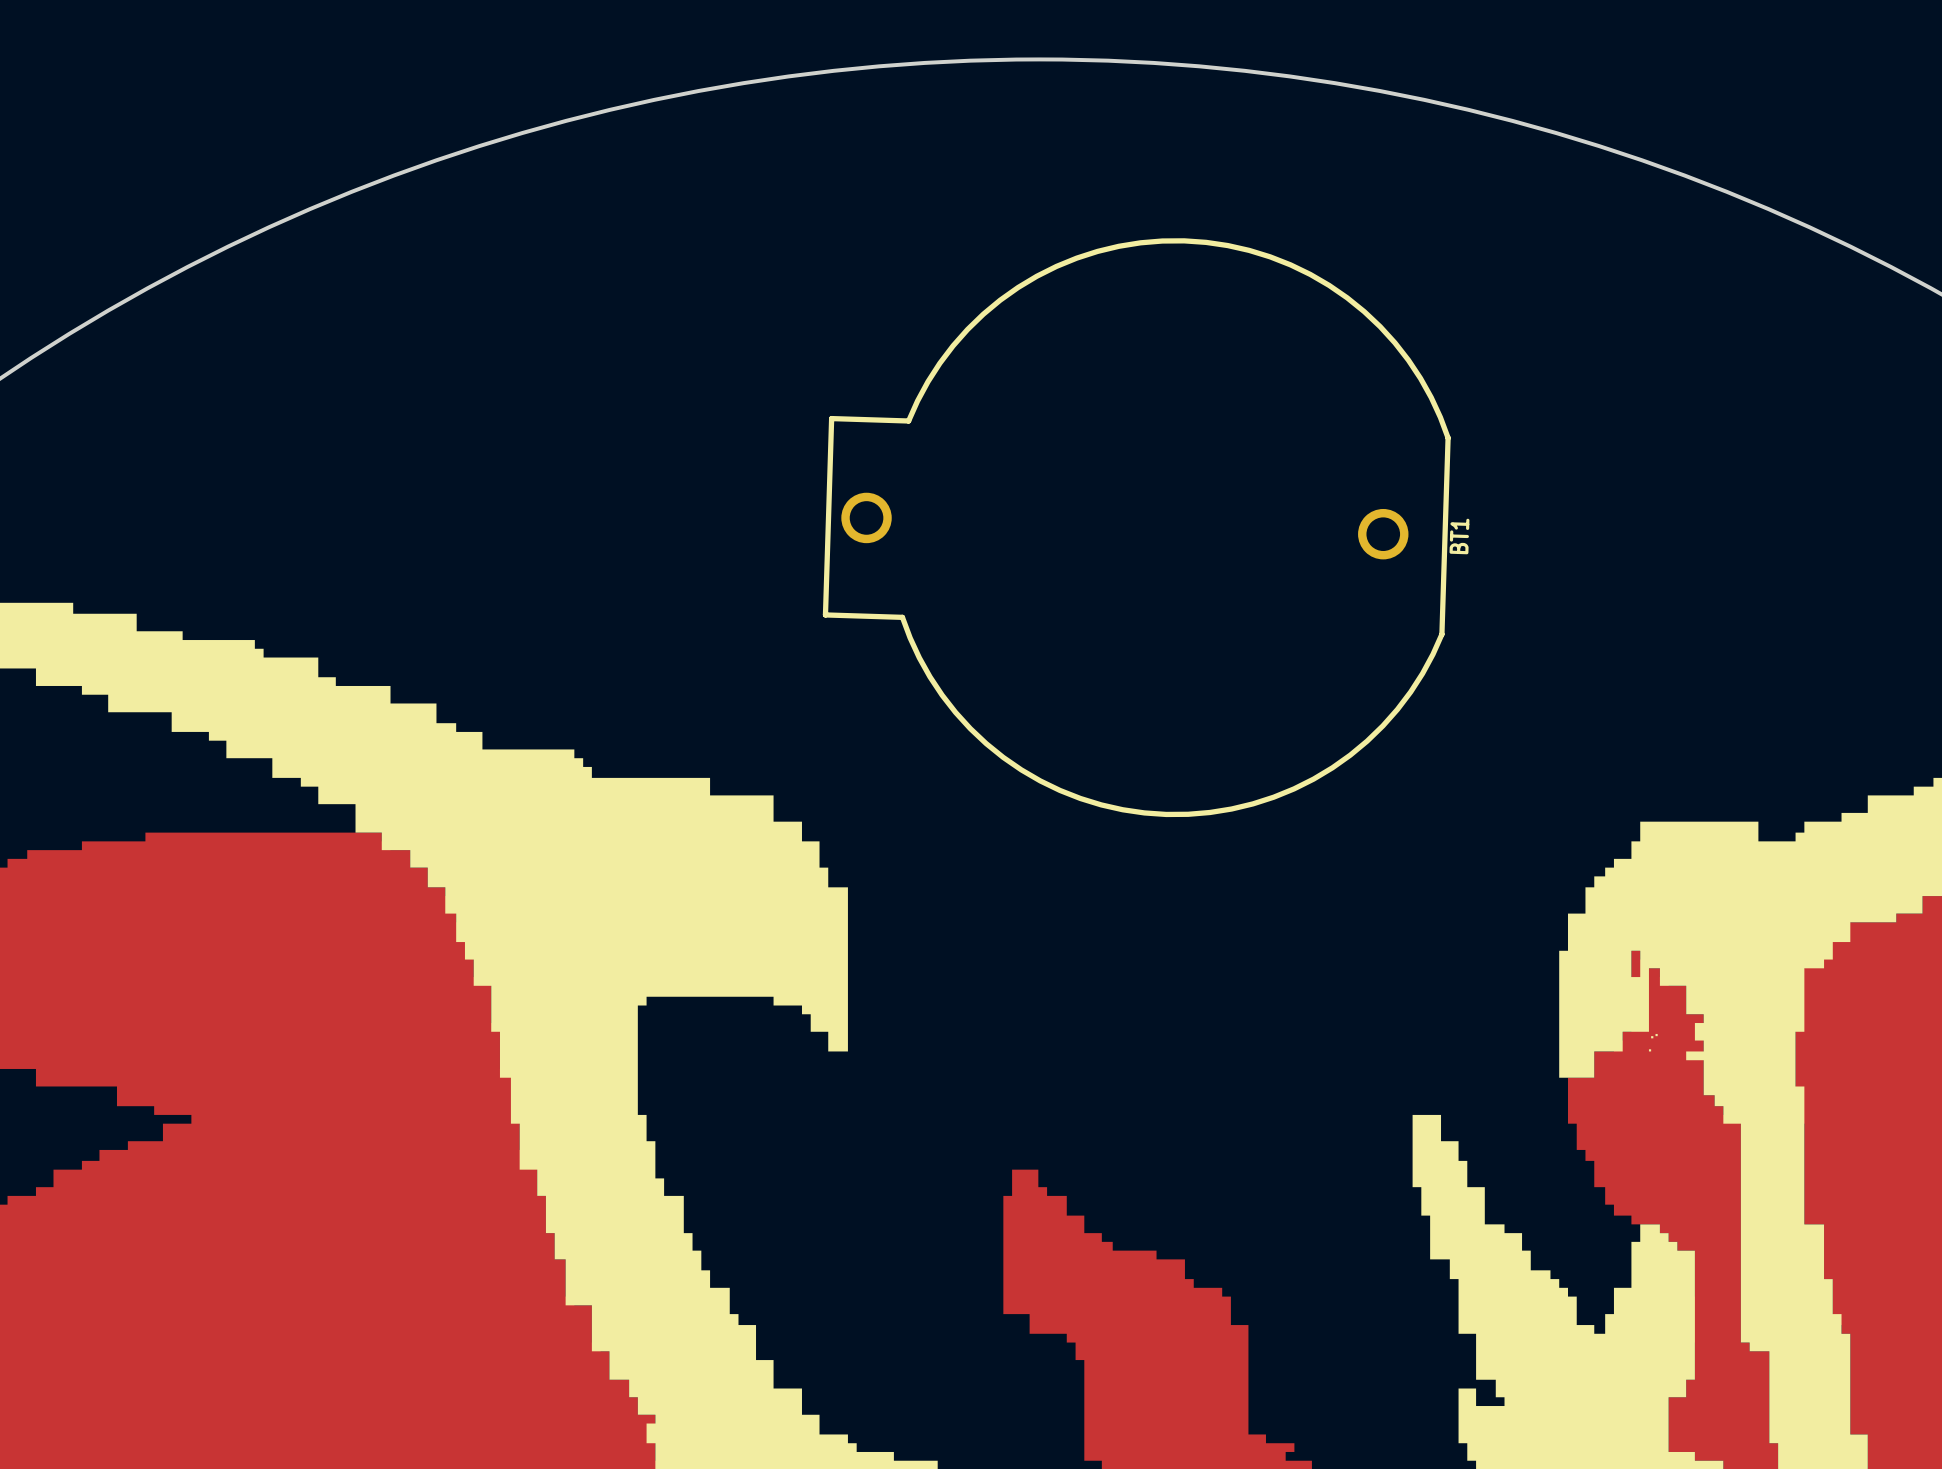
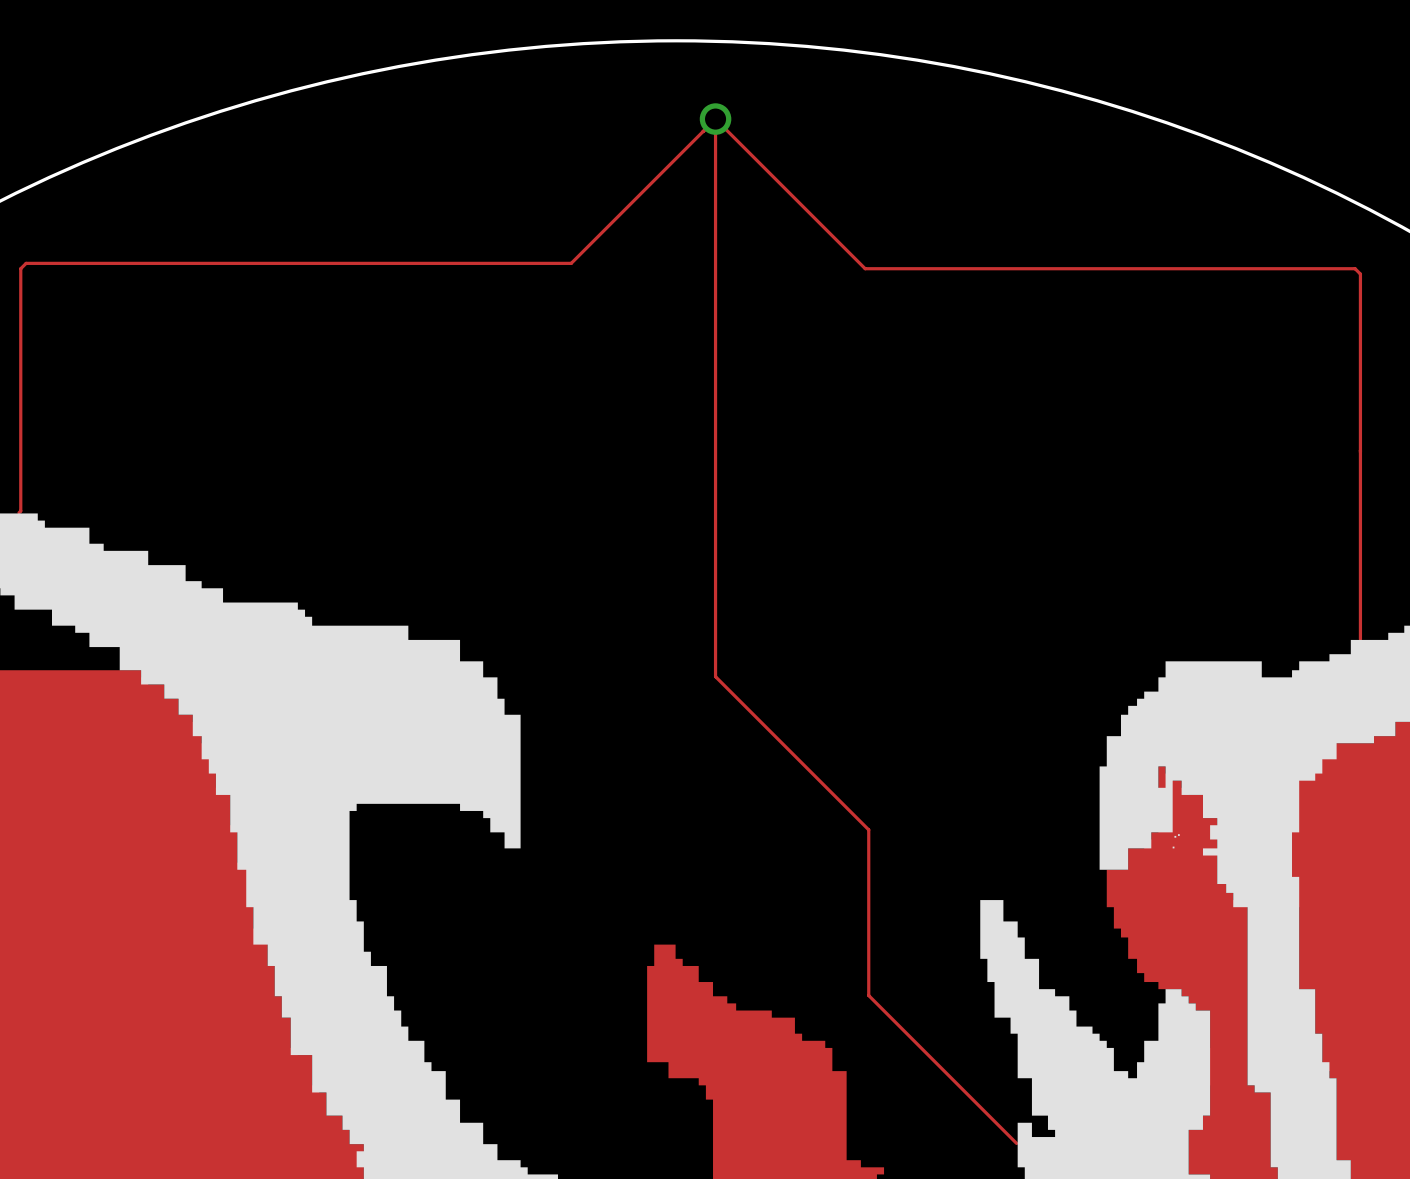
top track: none -> (715, 119) (571, 263) (26, 263) (20, 268) (20, 511) (18, 512)
top track: none -> (715, 119) (865, 268) (1355, 268) (1360, 274) (1360, 639)
top track: none -> (715, 119) (715, 676) (868, 829) (868, 995) (1016, 1143)
via: none -> (715, 119)
BT1: (1136, 527) -> none

